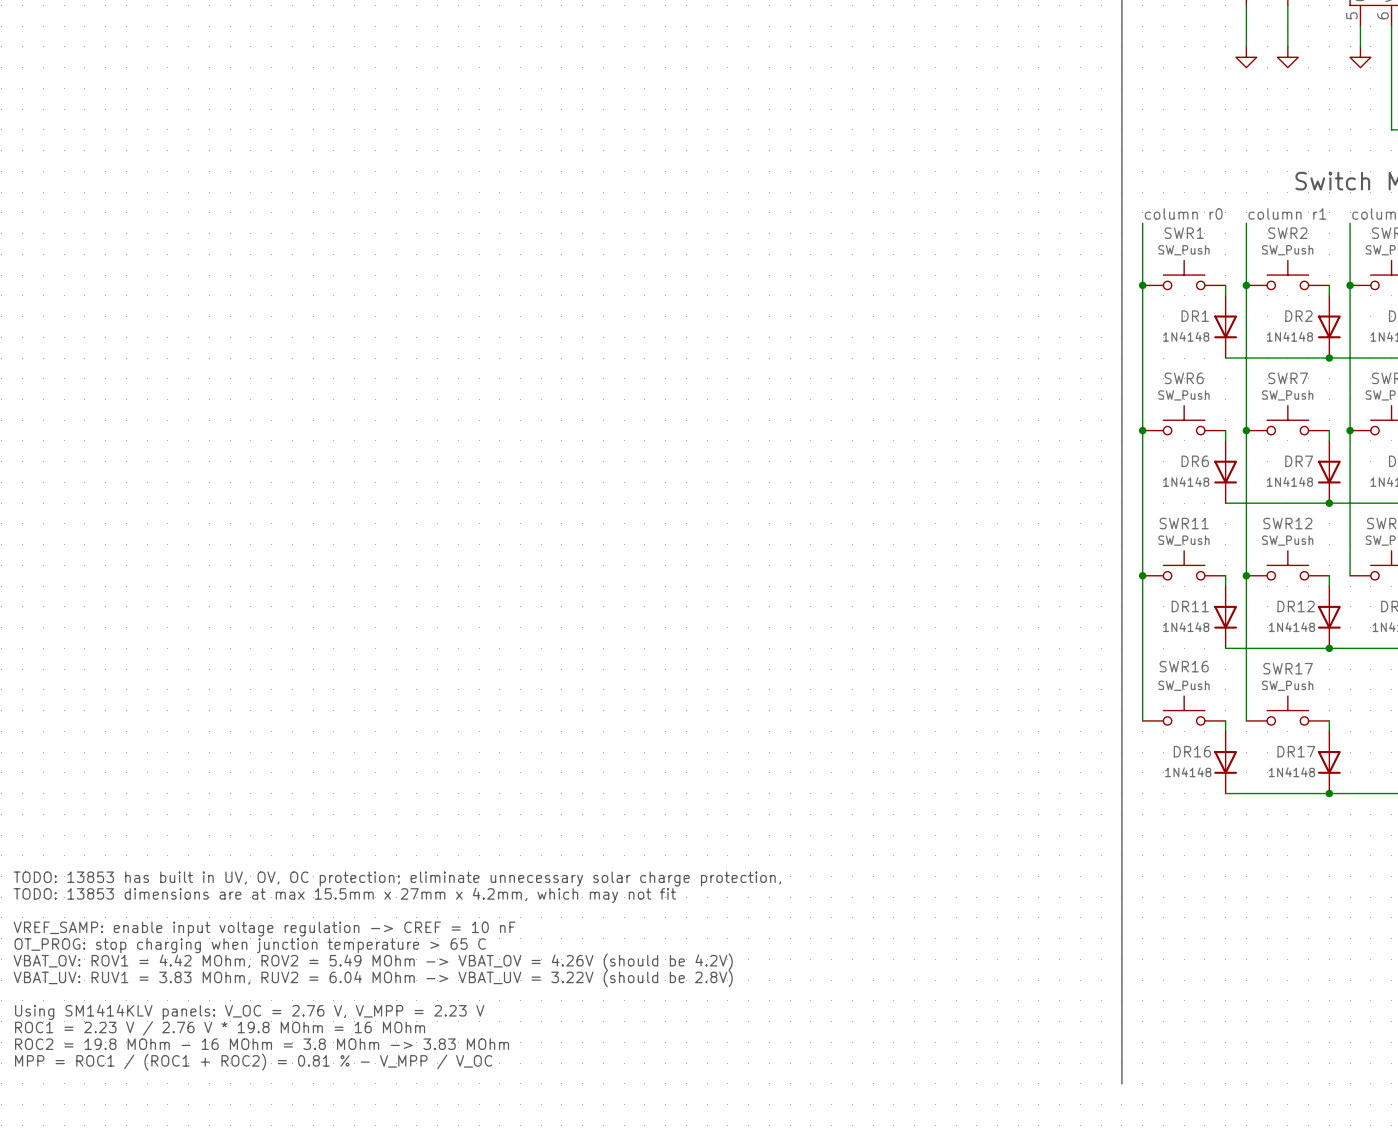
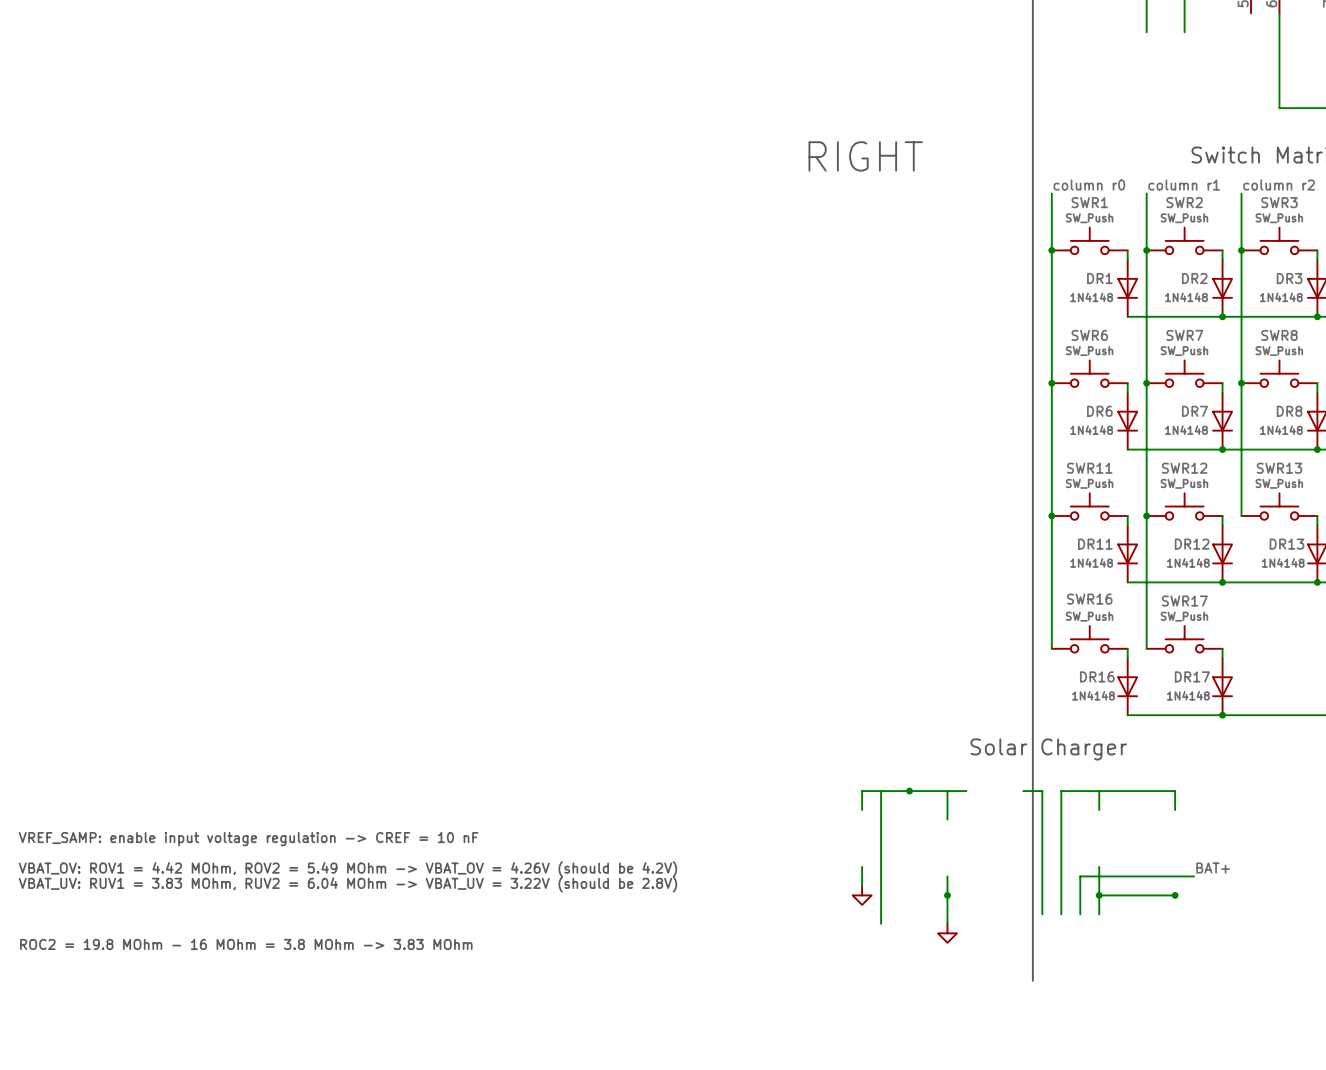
wire: (1360, 26) (1360, 46) -> none
power symbol: (1246, 57) -> none
power symbol: (1287, 57) -> none
power symbol: (1360, 57) -> none
text: none -> RIGHT (865, 156)
text: none -> Solar Charger (1048, 749)
wire: none -> (881, 791) (881, 923)
junction: none -> (909, 791)
wire: none -> (947, 791) (947, 819)
wire: none -> (966, 791) (862, 791) (862, 810)
wire: none -> (1023, 791) (1042, 791) (1042, 914)
wire: none -> (1099, 791) (1099, 810)
text: TODO: 13853 has built in UV, OV, OC protection; eliminate unnecessary solar charge protection, (397, 878) -> none
text: TODO: 13853 dimensions are at max 15.5mm x 27mm x 4.2mm, which may not fit (344, 895) -> none
wire: none -> (1175, 810) (1175, 791) (1061, 791) (1061, 914)
text: OT_PROG: stop charging when junction temperature > 65 C (250, 945) -> none
wire: none -> (862, 866) (862, 885)
wire: none -> (1099, 866) (1099, 914)
label: none -> BAT+ (1213, 867)
wire: none -> (947, 876) (947, 923)
wire: none -> (1194, 876) (1080, 876) (1080, 914)
power symbol: none -> (862, 895)
junction: none -> (947, 895)
wire: none -> (1099, 895) (1175, 895)
junction: none -> (1099, 895)
junction: none -> (1175, 895)
text: Using SM1414KLV panels: V_OC = 2.76 V, V_MPP = 2.23 V (249, 1012) -> none
text: ROC1 = 2.23 V / 2.76 V * 19.8 MOhm = 16 MOhm (220, 1028) -> none
power symbol: none -> (947, 933)
text: MPP = ROC1 / (ROC1 + ROC2) = 0.81 % - V_MPP / V_OC (253, 1062) -> none

